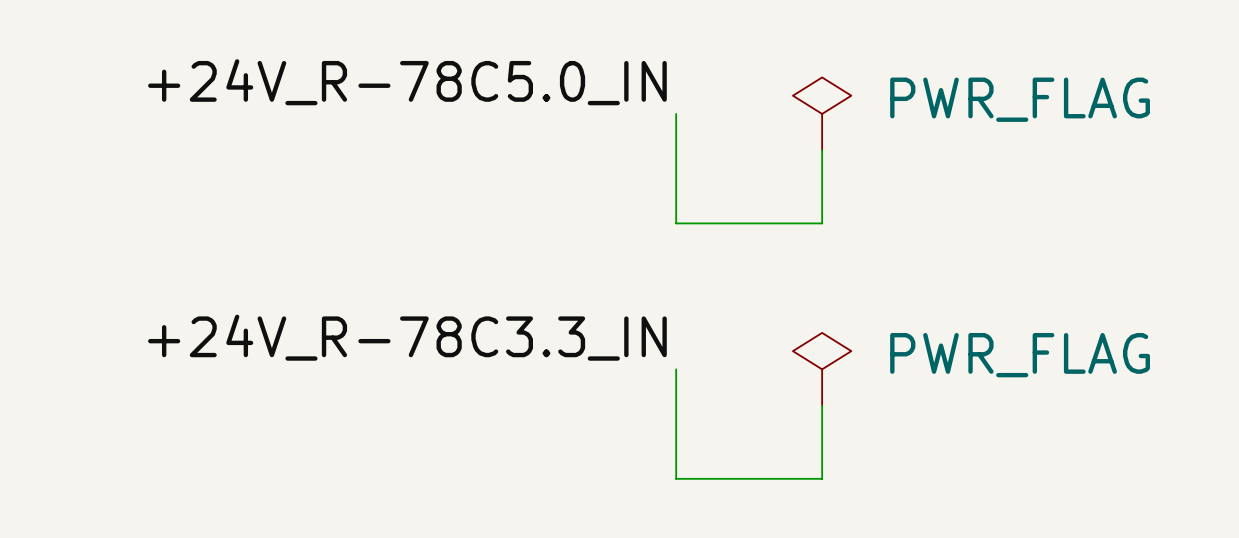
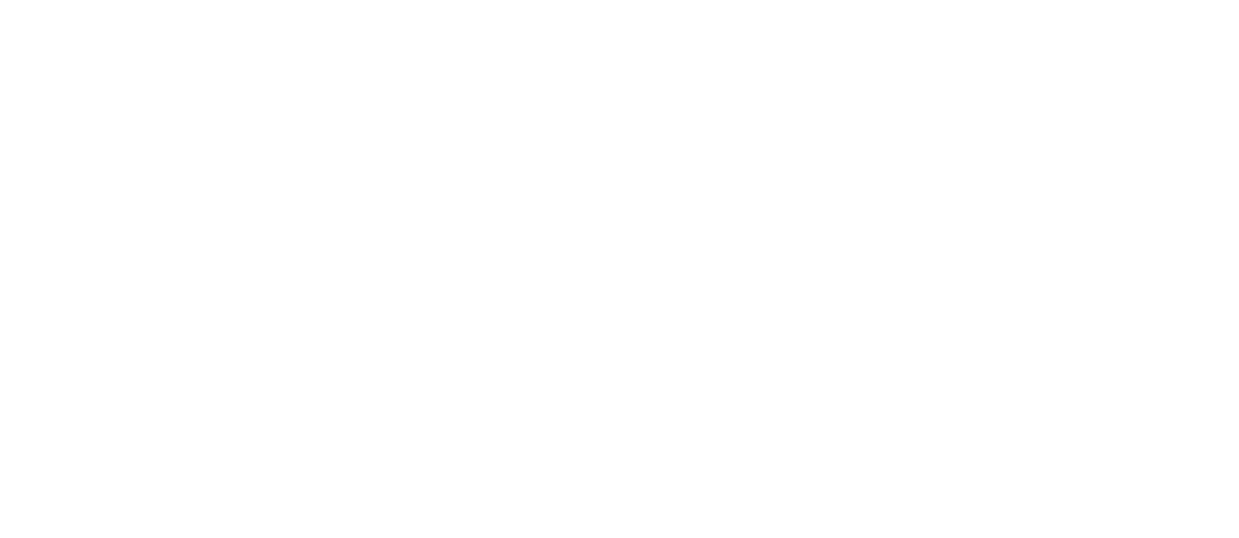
label: +24V_R-78C5.0_IN (407, 82) -> none
wire: (676, 113) (676, 223) (822, 223) (822, 150) -> none
power symbol: PWR_FLAG (822, 113) -> none
label: +24V_R-78C3.3_IN (407, 337) -> none
wire: (676, 369) (676, 478) (822, 478) (822, 405) -> none
power symbol: PWR_FLAG (822, 369) -> none

